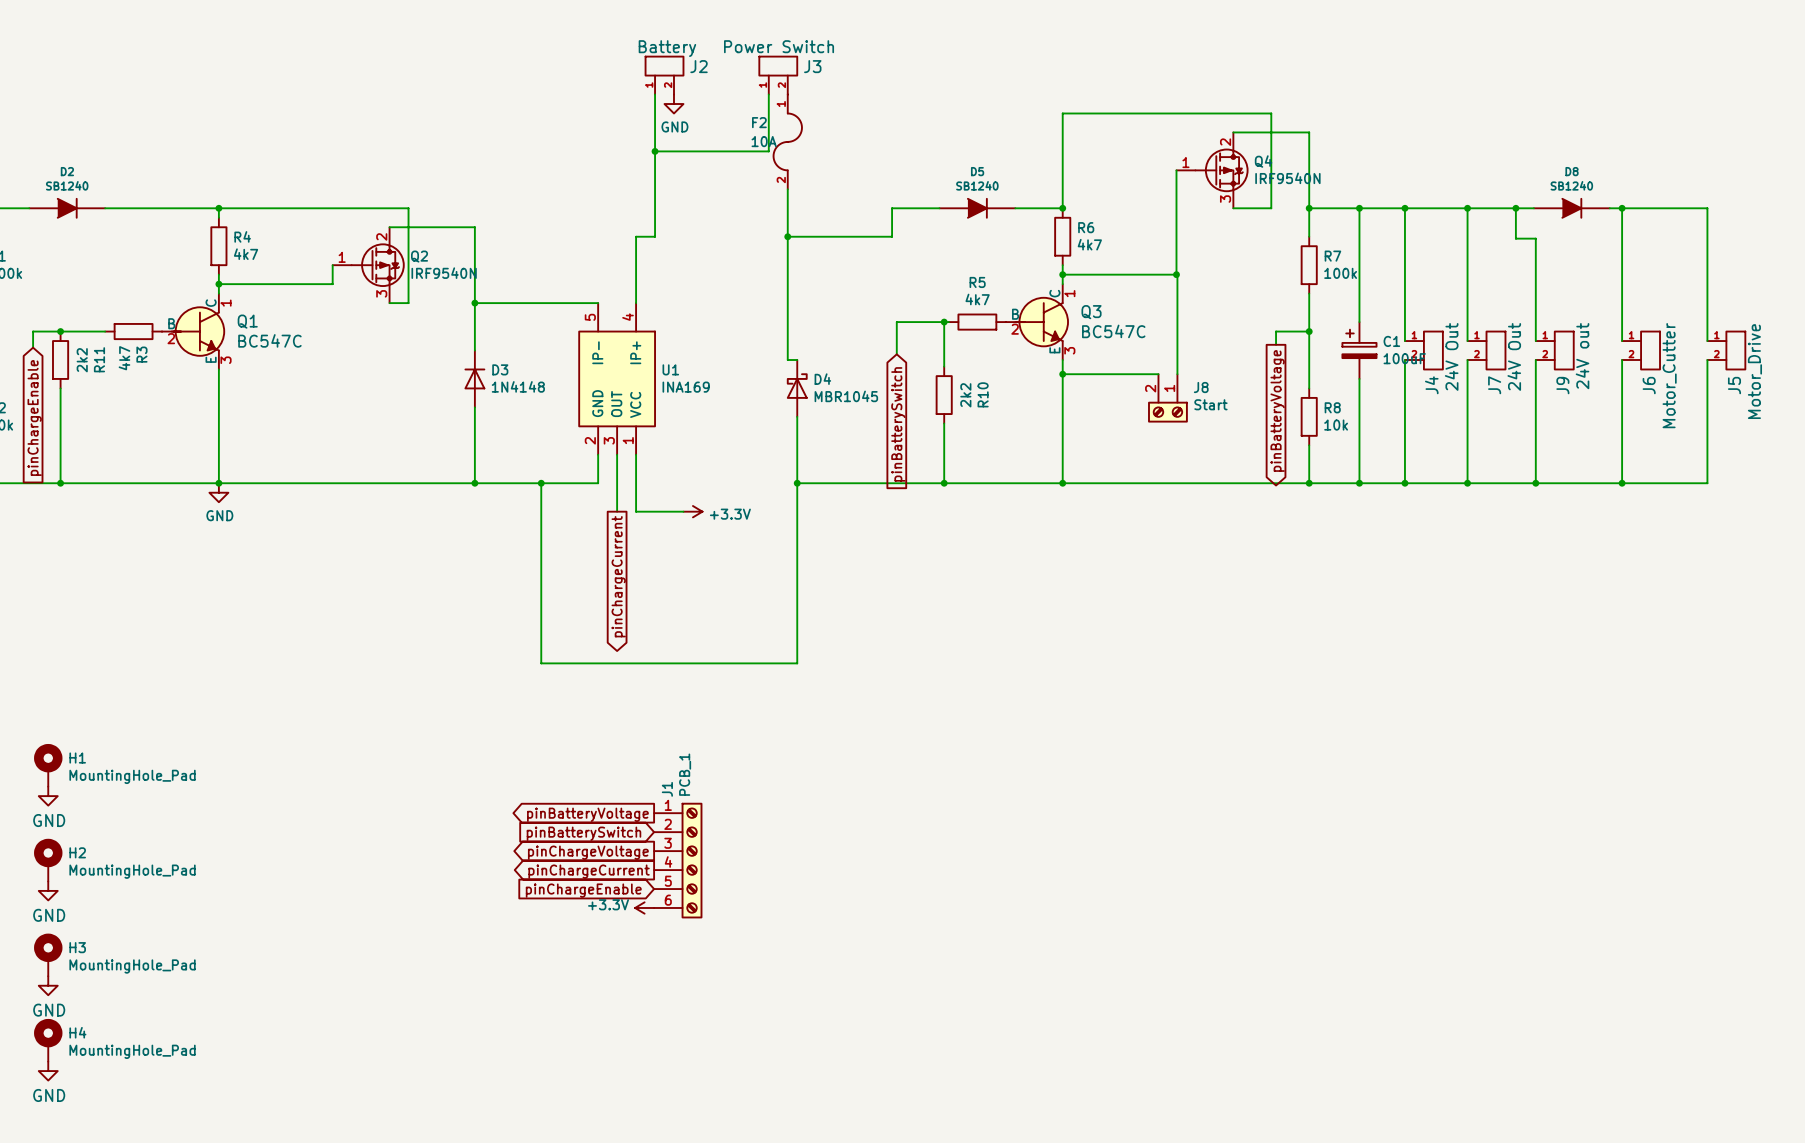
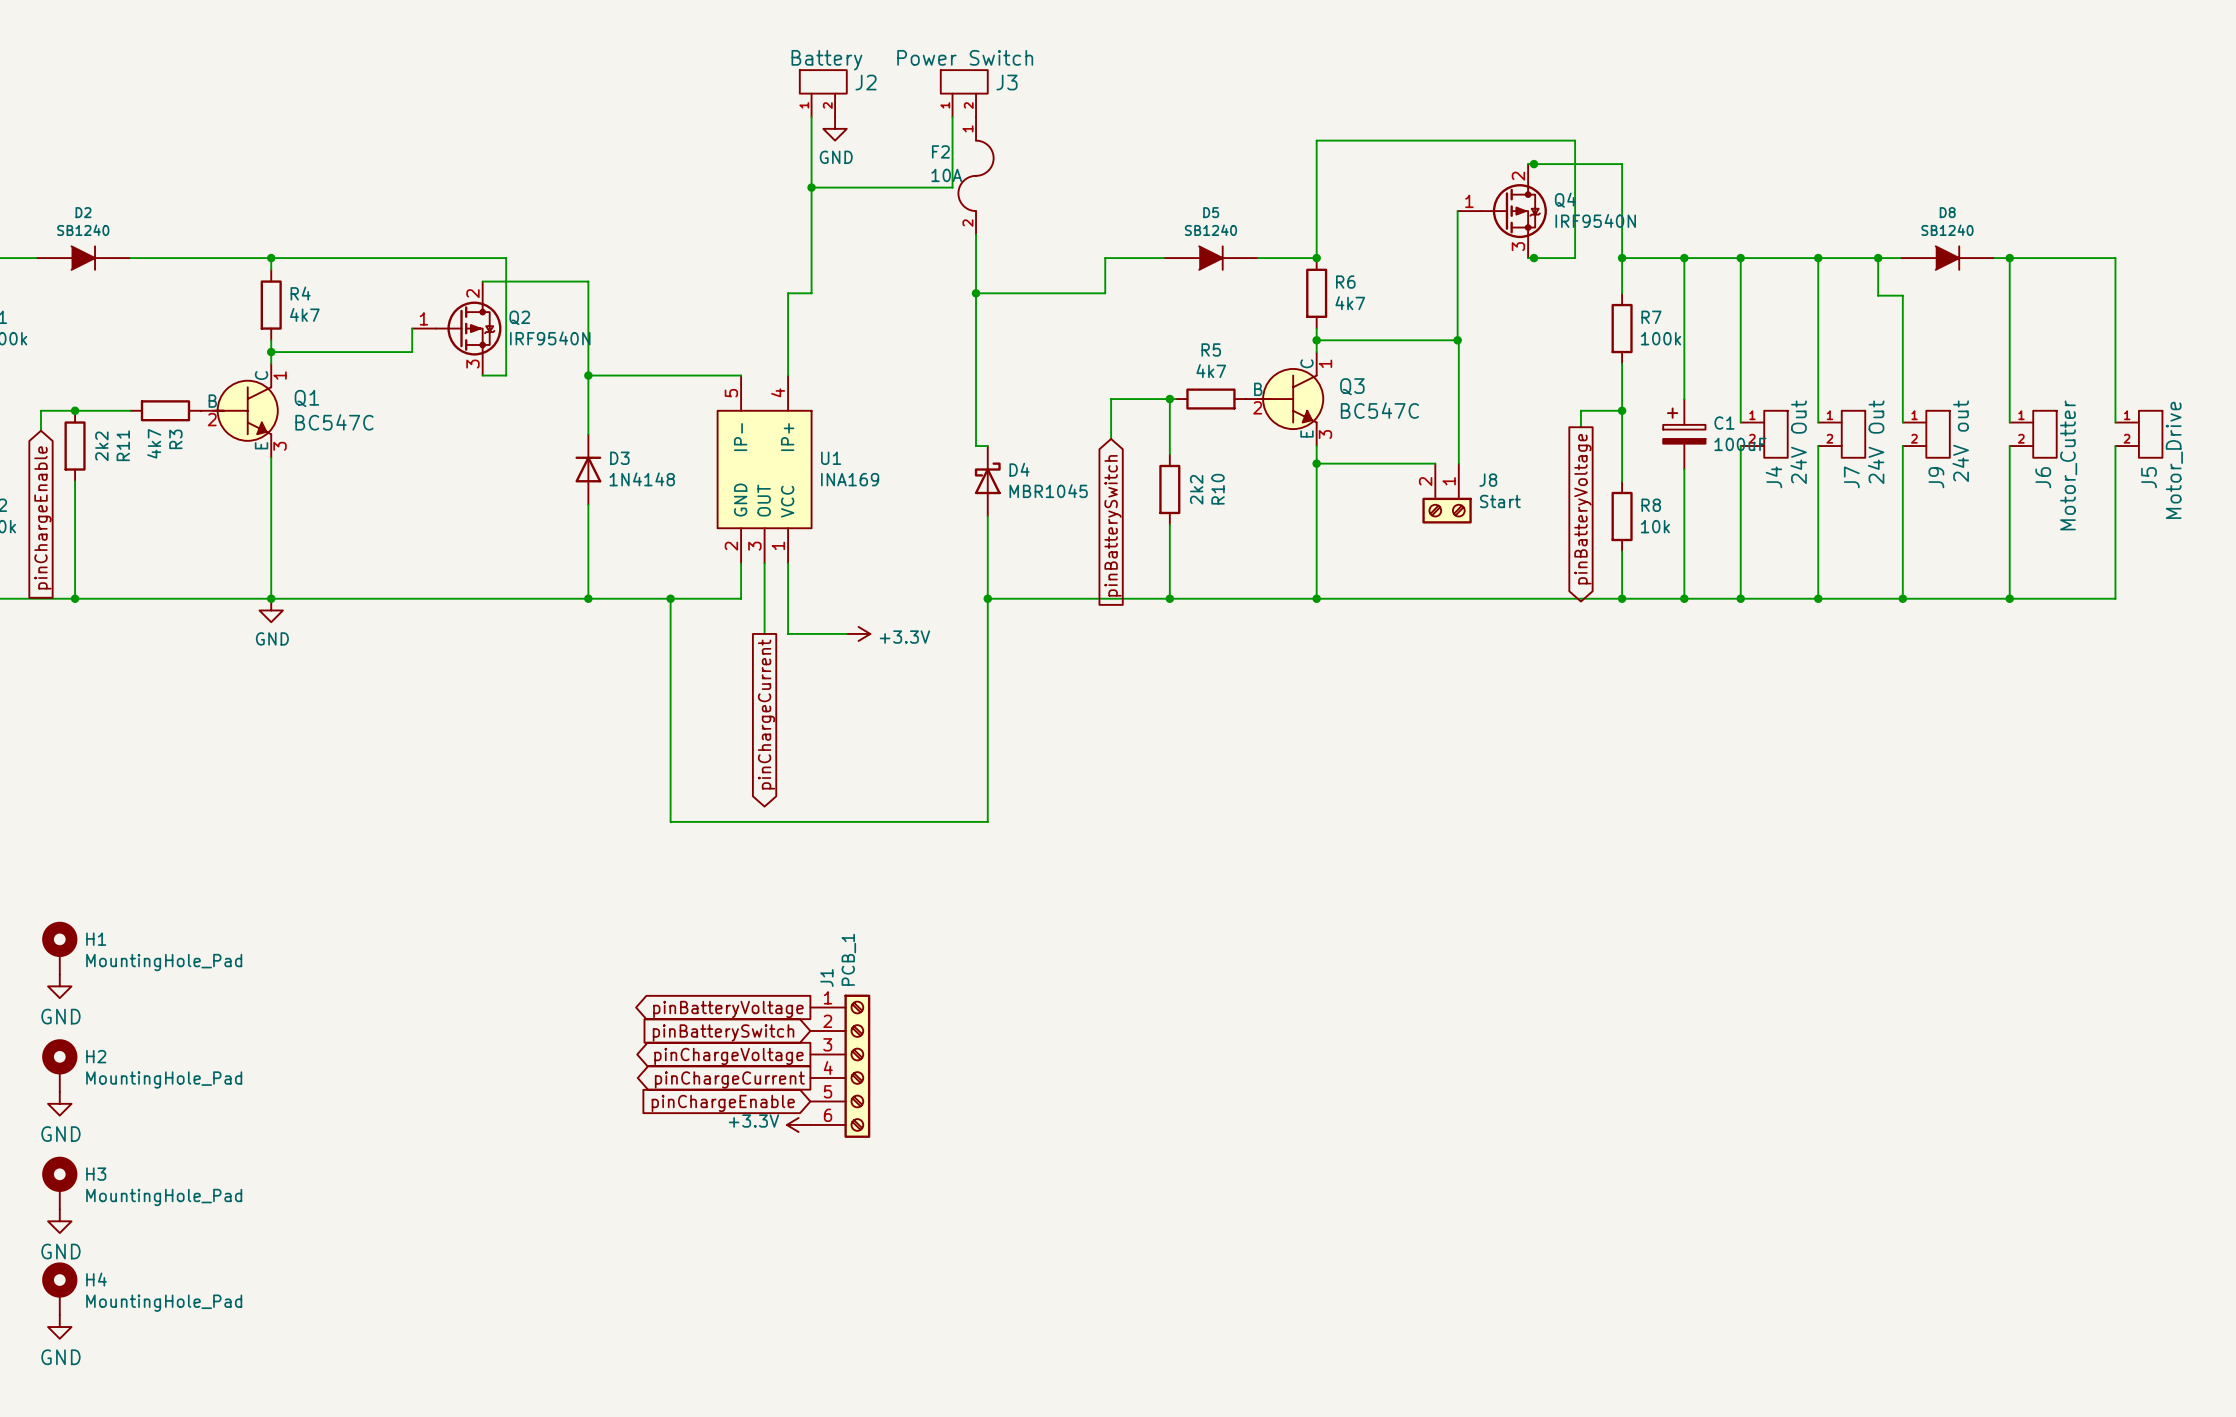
junction: none -> (1533, 164)
junction: none -> (1533, 258)

